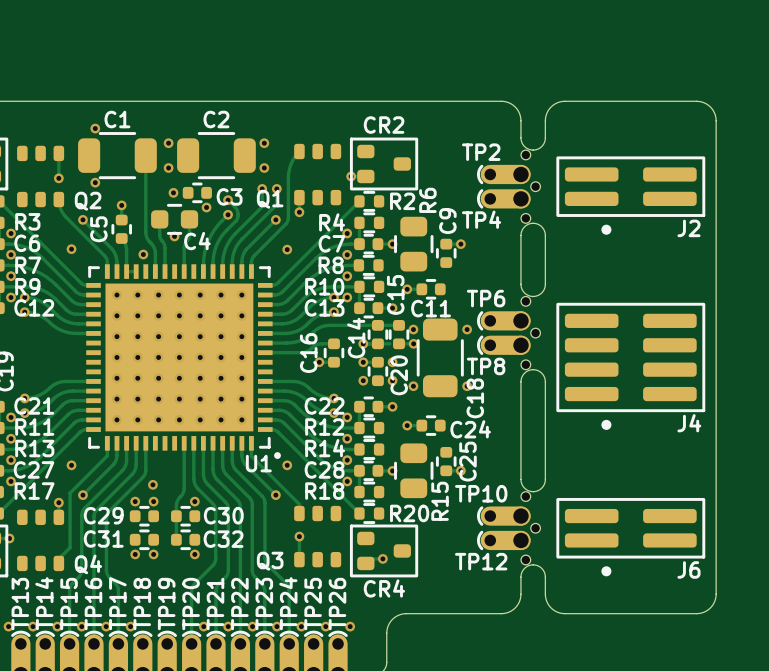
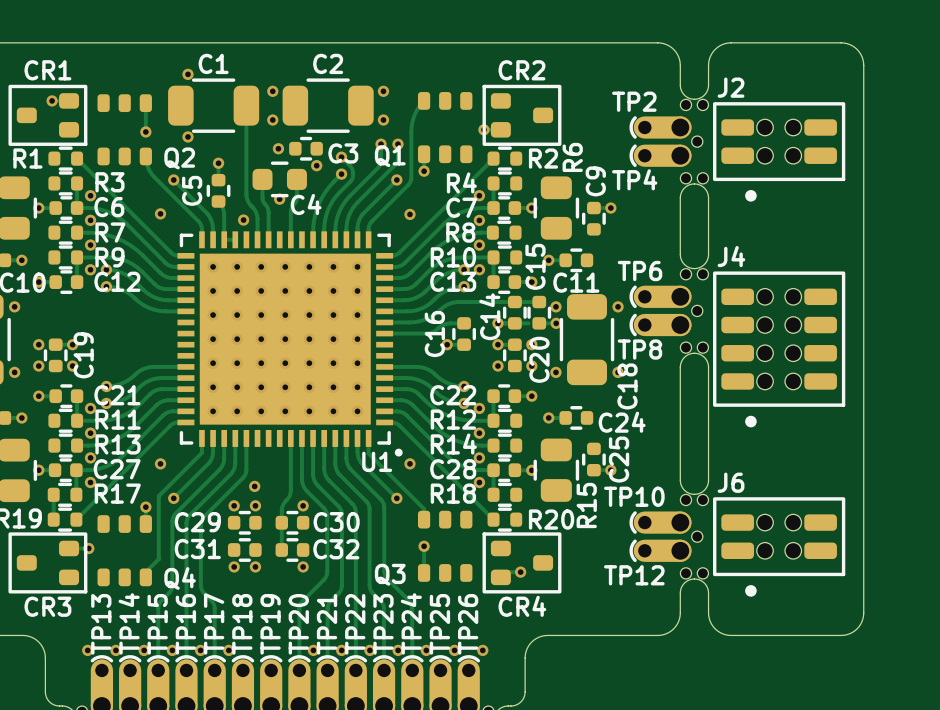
board edge: (660, 101) (704, 102) (712, 108) (716, 120) (715, 596) (712, 606) (701, 613) (660, 613) -> (841, 42) (849, 44) (857, 49) (862, 56) (863, 65) (863, 612) (862, 621) (857, 628) (849, 633) (841, 635)
part footprint: [521, 150, 541, 224] -> [680, 99, 709, 184]
J2 footprint: [556, 156, 706, 235] -> [713, 102, 846, 202]
J2 name position: J2 (688, 228) -> J2 (731, 87)
part footprint: [521, 296, 541, 370] -> [680, 268, 709, 354]
J4 footprint: [556, 302, 706, 430] -> [713, 271, 846, 428]
J4 name position: J4 (689, 423) -> J4 (731, 256)
part footprint: [521, 491, 541, 565] -> [680, 494, 709, 579]
J6 footprint: [556, 497, 706, 577] -> [713, 497, 846, 597]
J6 name position: J6 (688, 569) -> J6 (731, 482)

